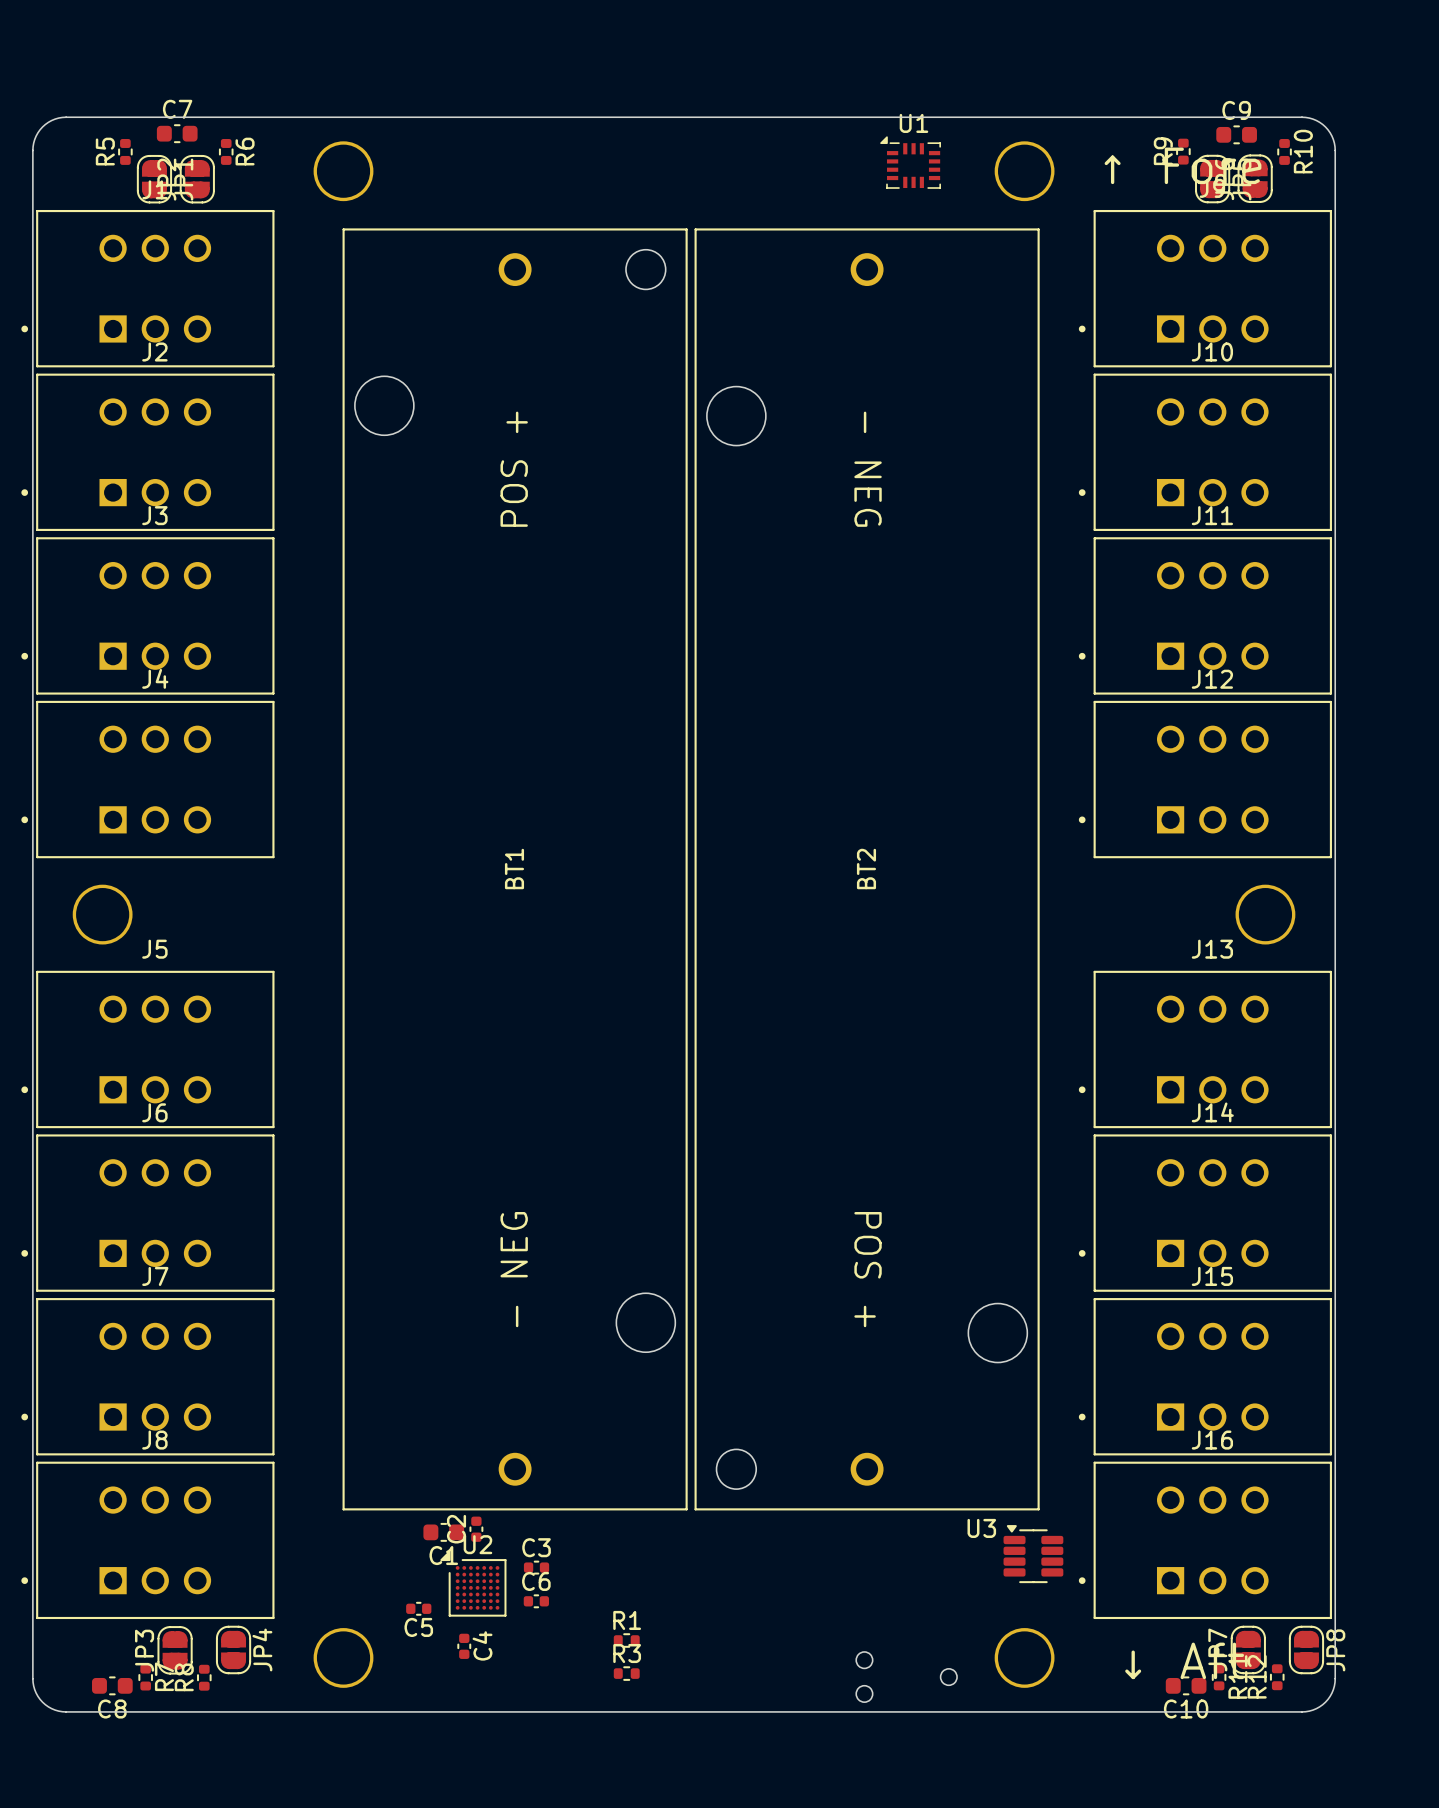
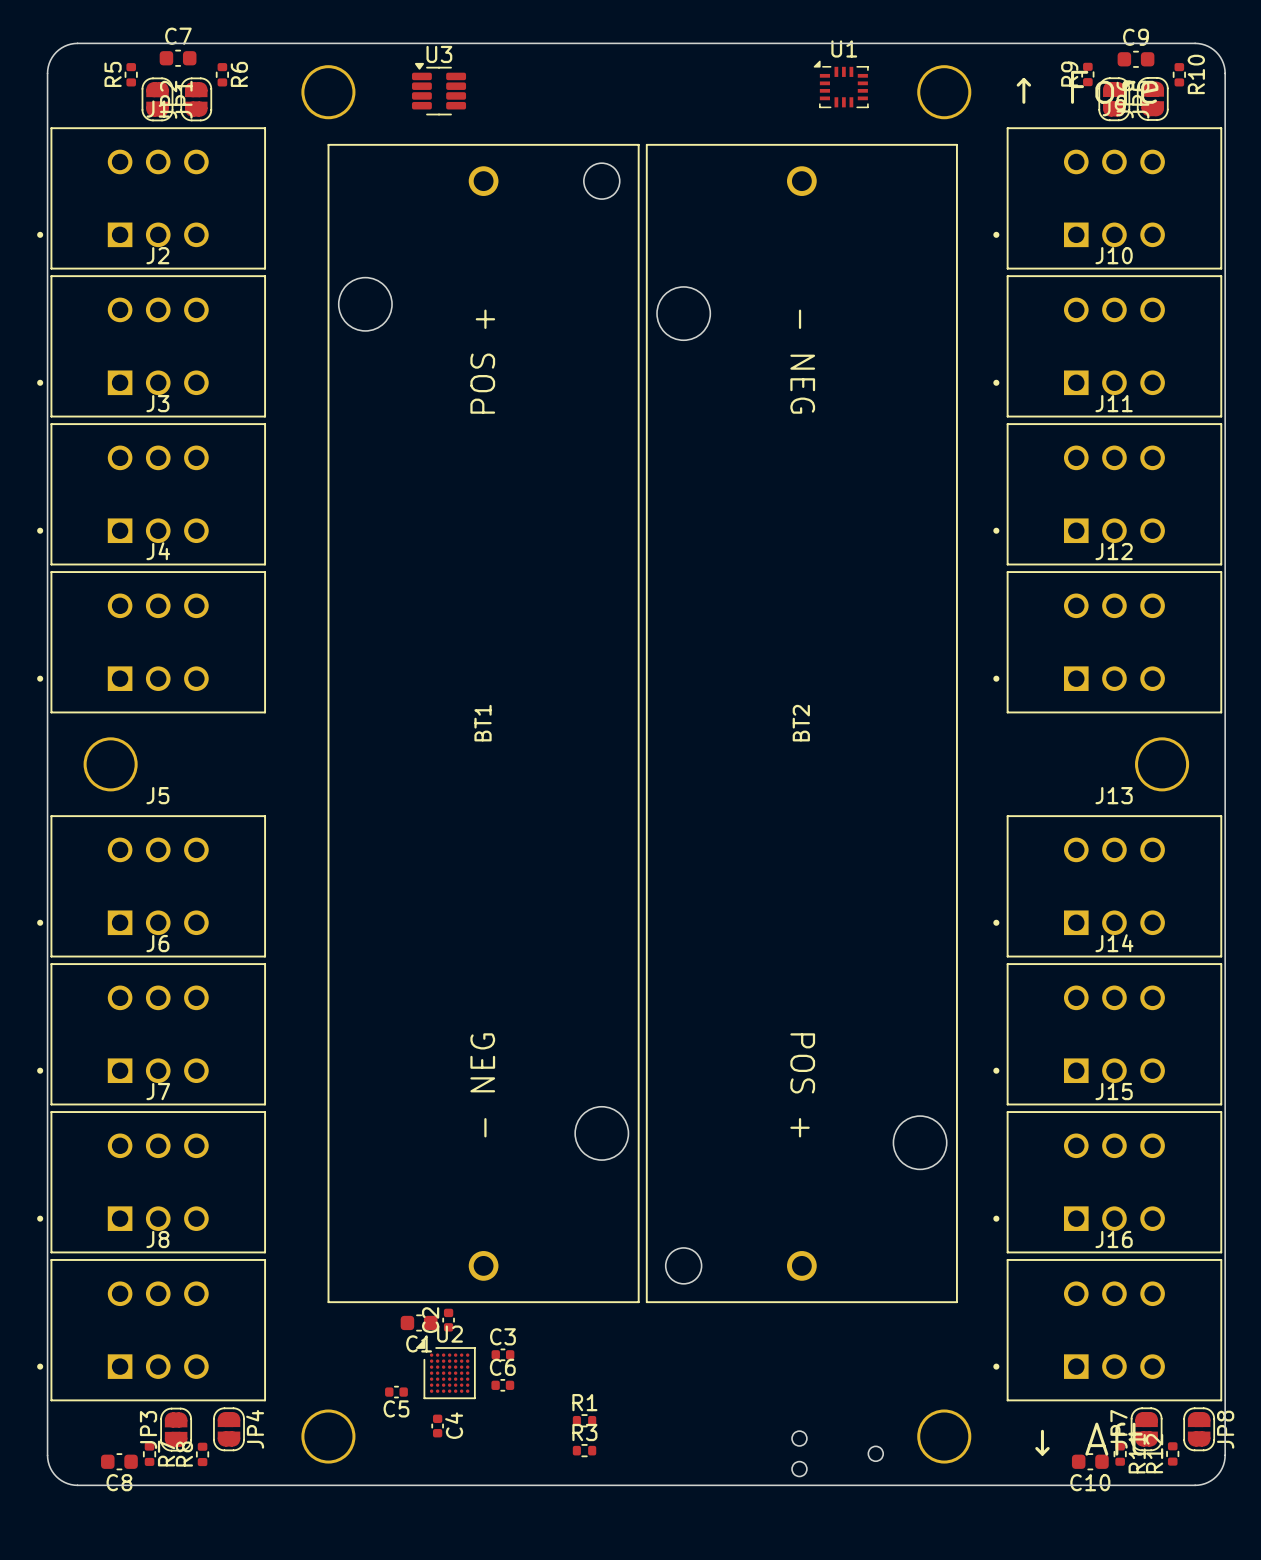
U3 name position: U3 (981, 1528) -> U3 (439, 54)
U3 position: (1033, 1554) -> (439, 89)

